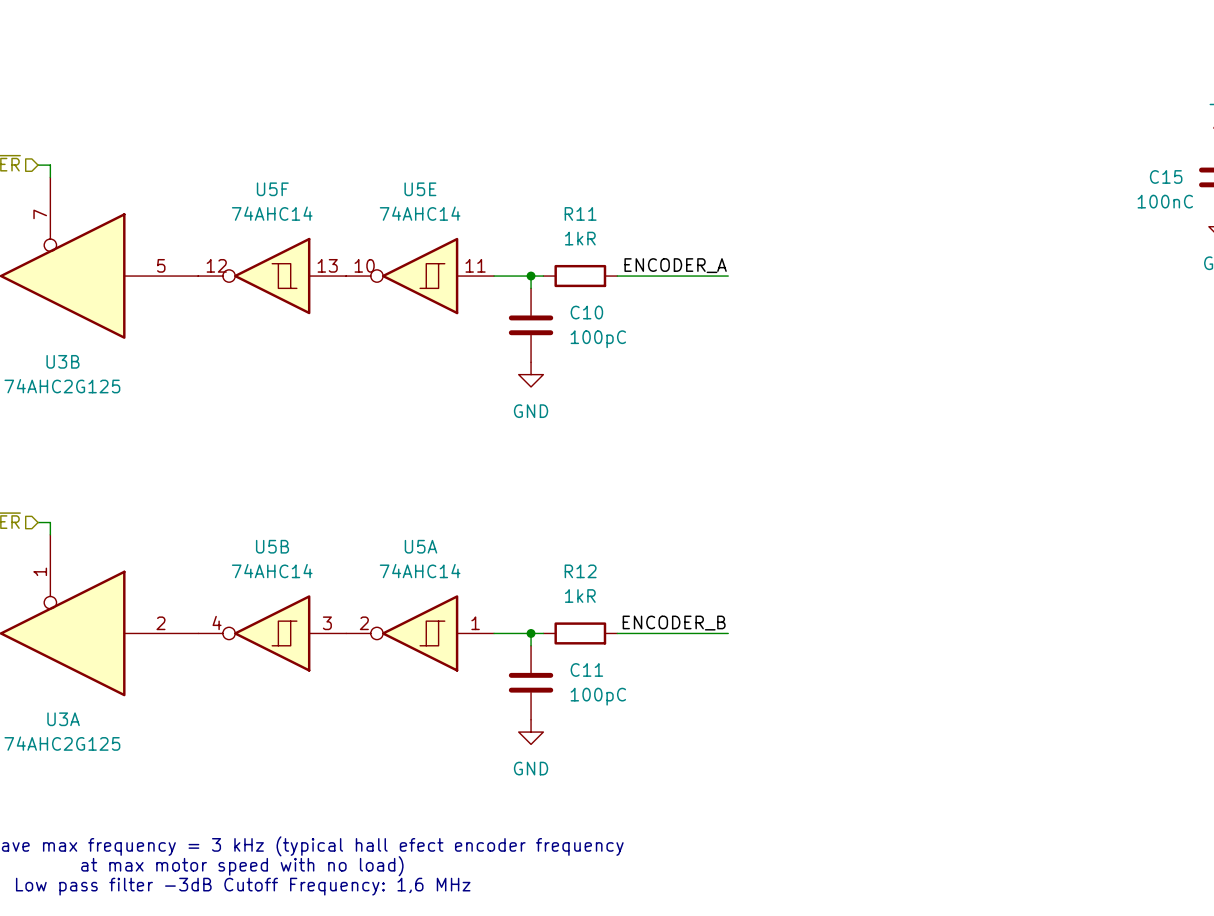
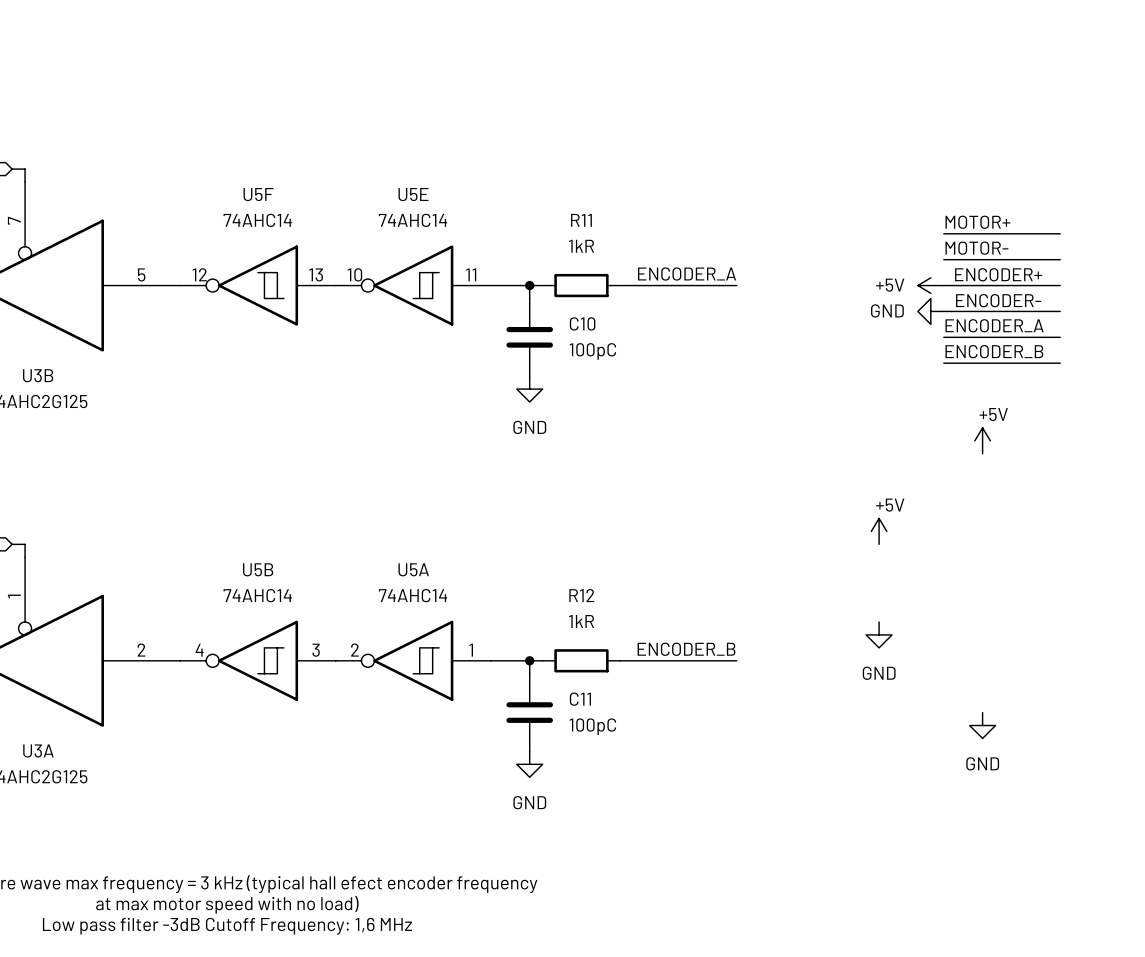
label: none -> MOTOR+ (977, 222)
wire: none -> (943, 233) (1060, 233)
label: none -> MOTOR- (976, 248)
wire: none -> (943, 259) (1060, 259)
text: none -> ENCODER+ (998, 274)
power symbol: none -> +5V (930, 285)
wire: none -> (943, 285) (1060, 285)
text: none -> ENCODER- (998, 300)
power symbol: none -> GND (930, 311)
wire: none -> (943, 311) (1060, 311)
label: none -> ENCODER_A (994, 325)
wire: none -> (943, 337) (1060, 337)
label: none -> ENCODER_B (994, 351)
wire: none -> (943, 363) (1060, 363)
power symbol: none -> +5V (982, 440)
power symbol: none -> +5V (879, 531)
power symbol: none -> GND (879, 634)
power symbol: none -> GND (982, 725)

